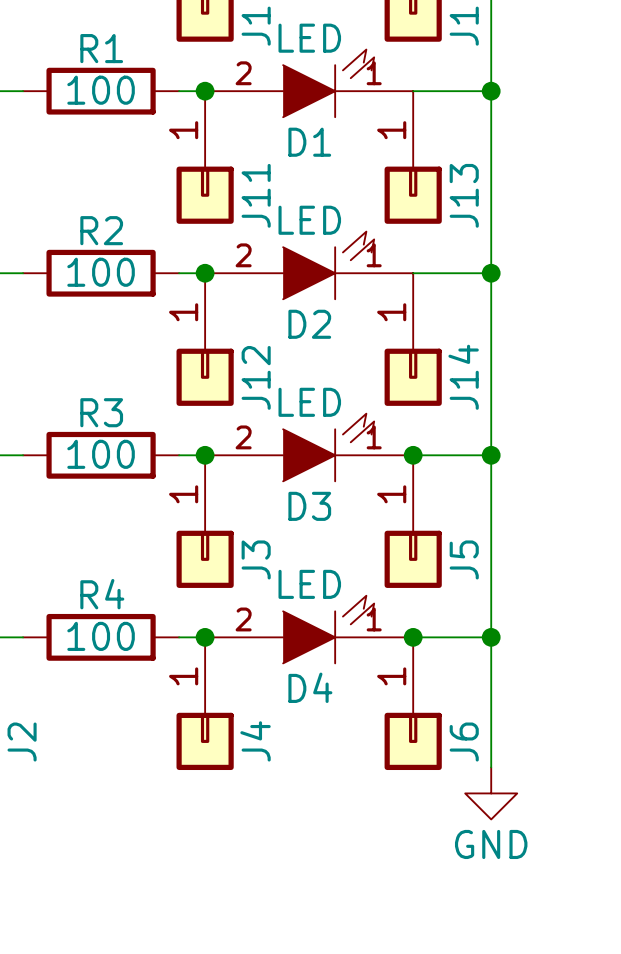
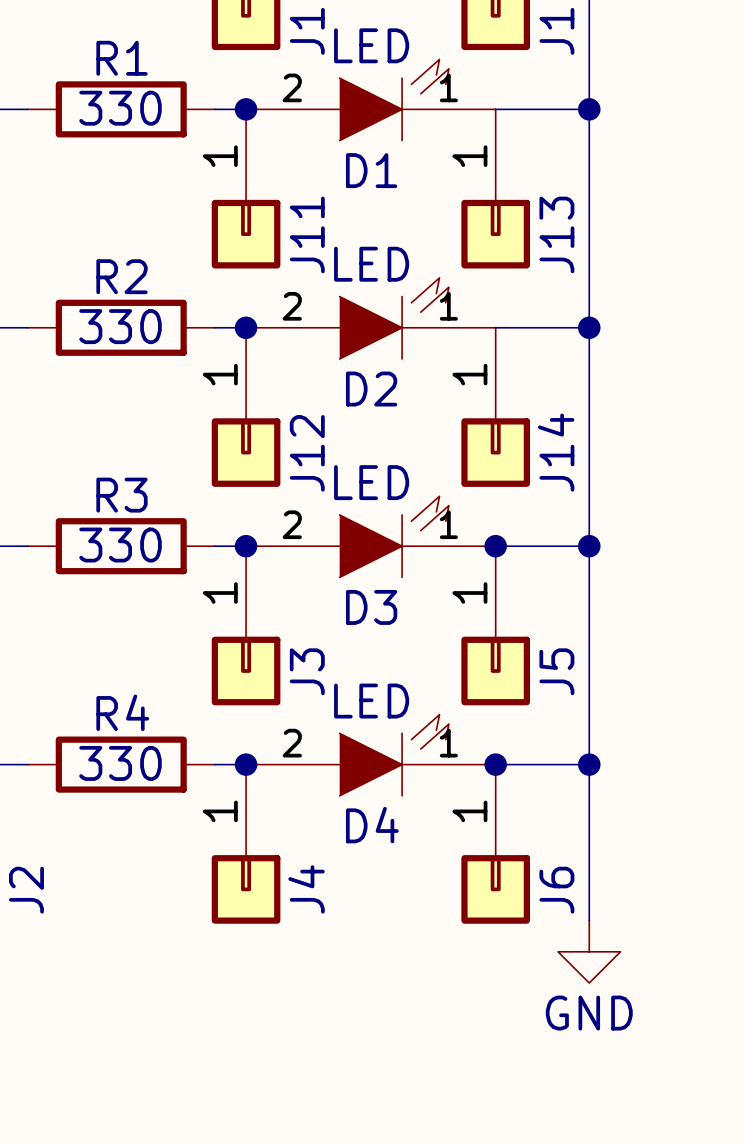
R1 value: 100 (101, 90) -> 330 (120, 108)
R2 value: 100 (101, 272) -> 330 (120, 326)
R3 value: 100 (101, 454) -> 330 (120, 545)
R4 value: 100 (101, 636) -> 330 (120, 763)

